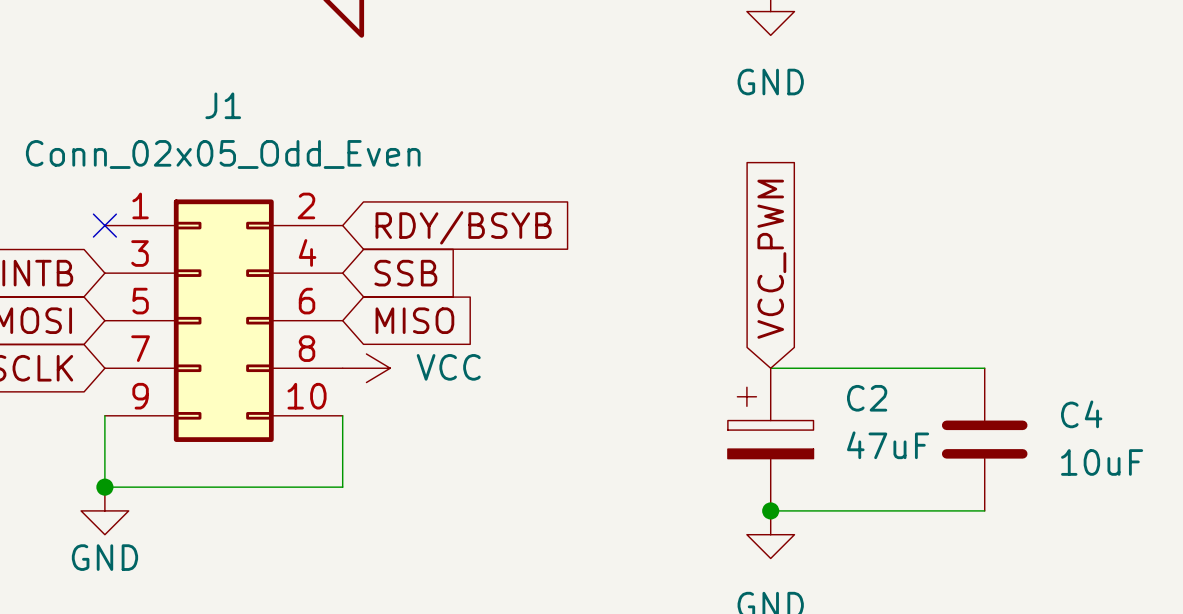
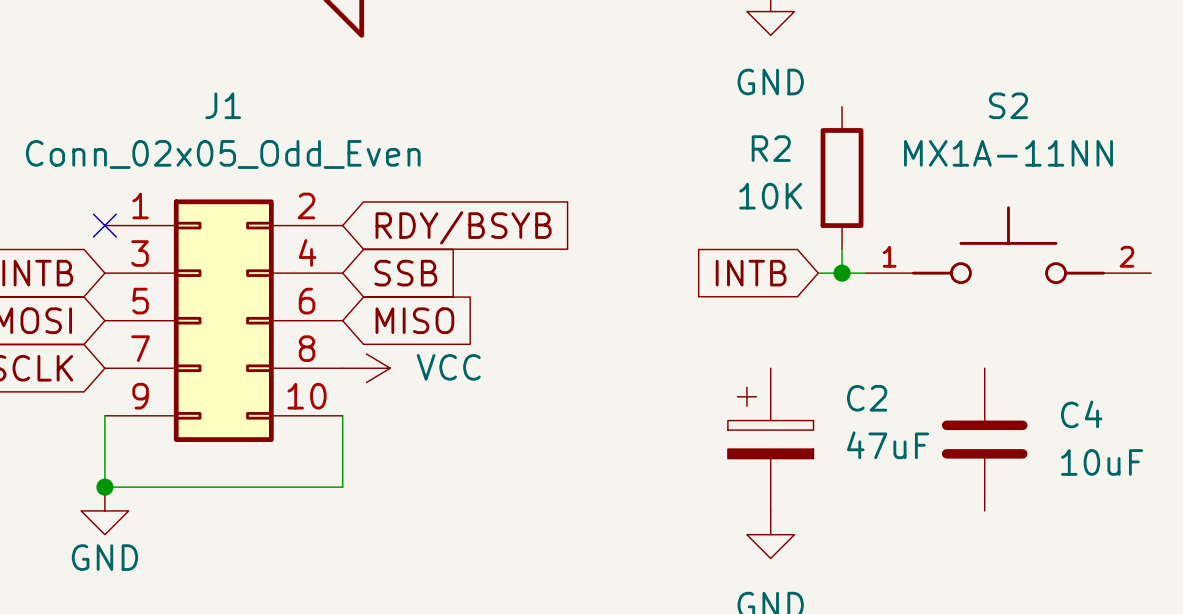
R2: none -> 10K (842, 178)
S2: none -> MX1A-11NN (1008, 245)
wire: none -> (842, 249) (842, 273)
global label: VCC_PWM (771, 259) -> none
global label: none -> INTB (751, 273)
wire: none -> (818, 273) (865, 273)
junction: none -> (842, 273)
wire: (770, 368) (984, 368) -> none
wire: (770, 510) (984, 510) -> none
junction: (770, 510) -> none

